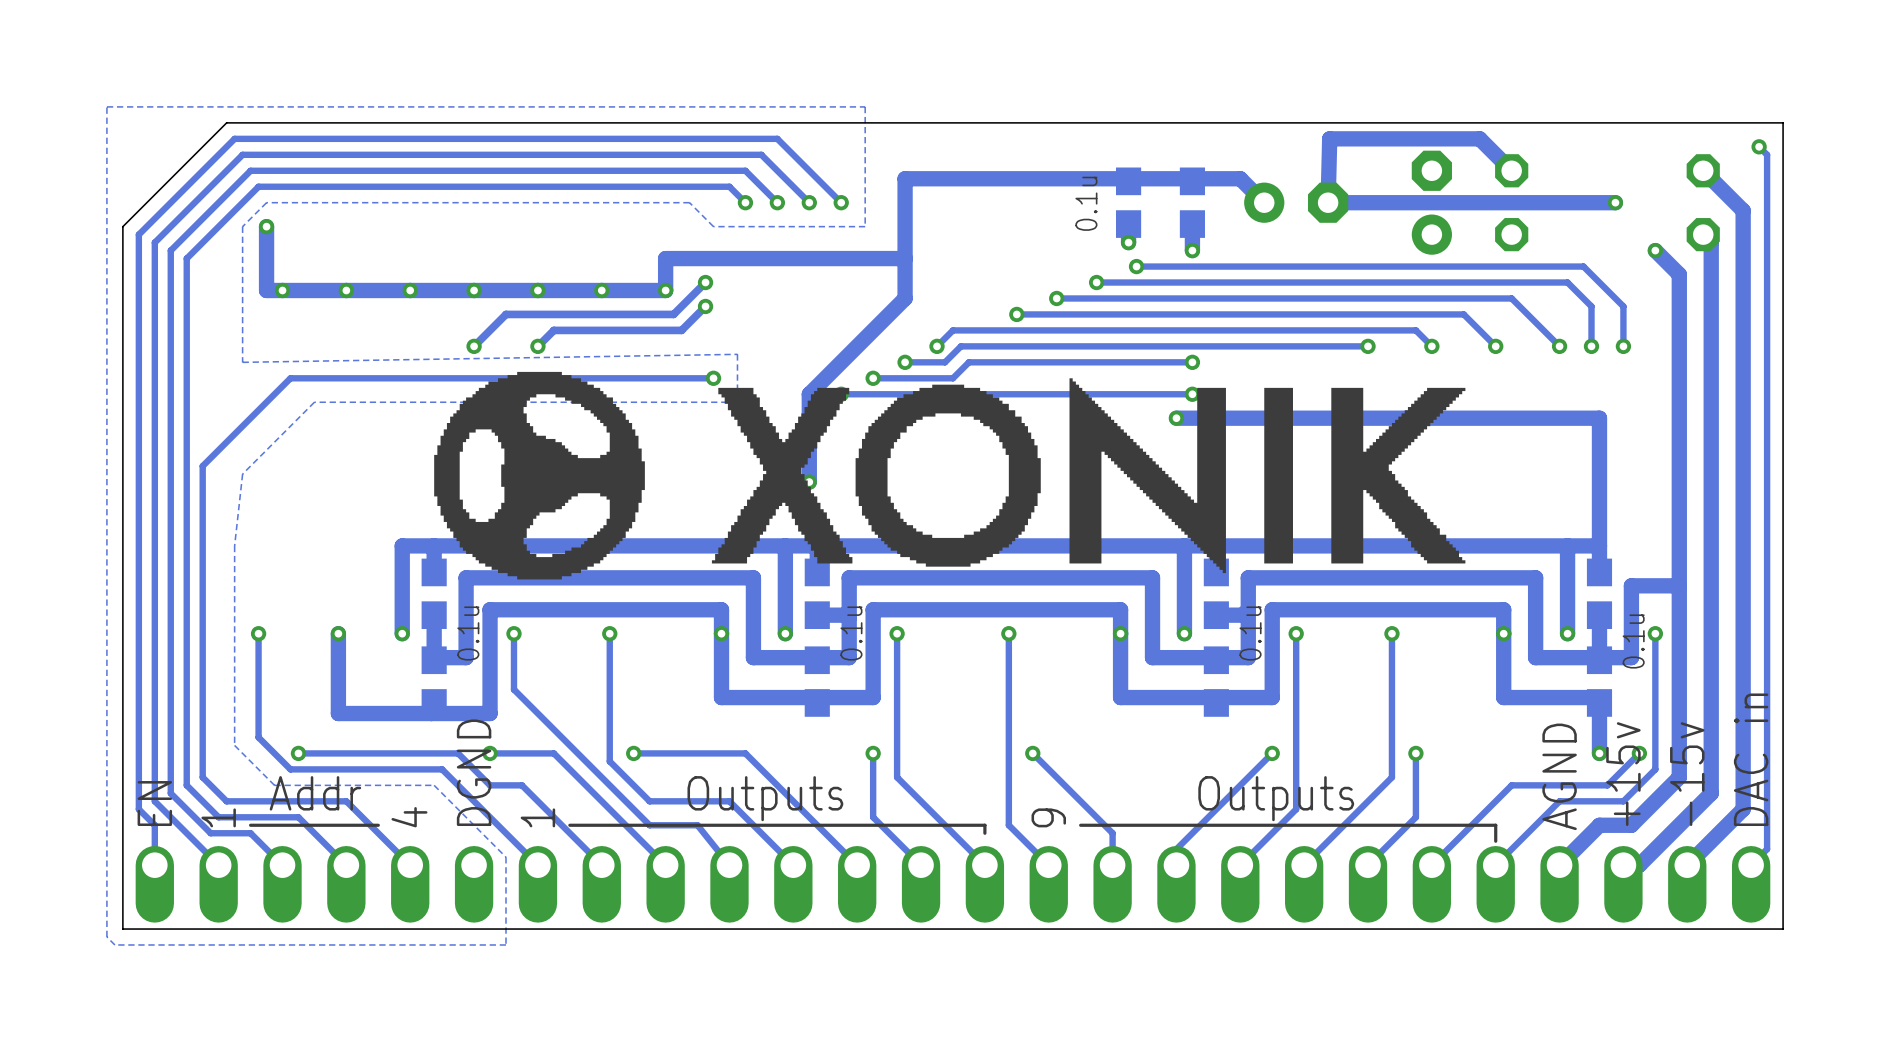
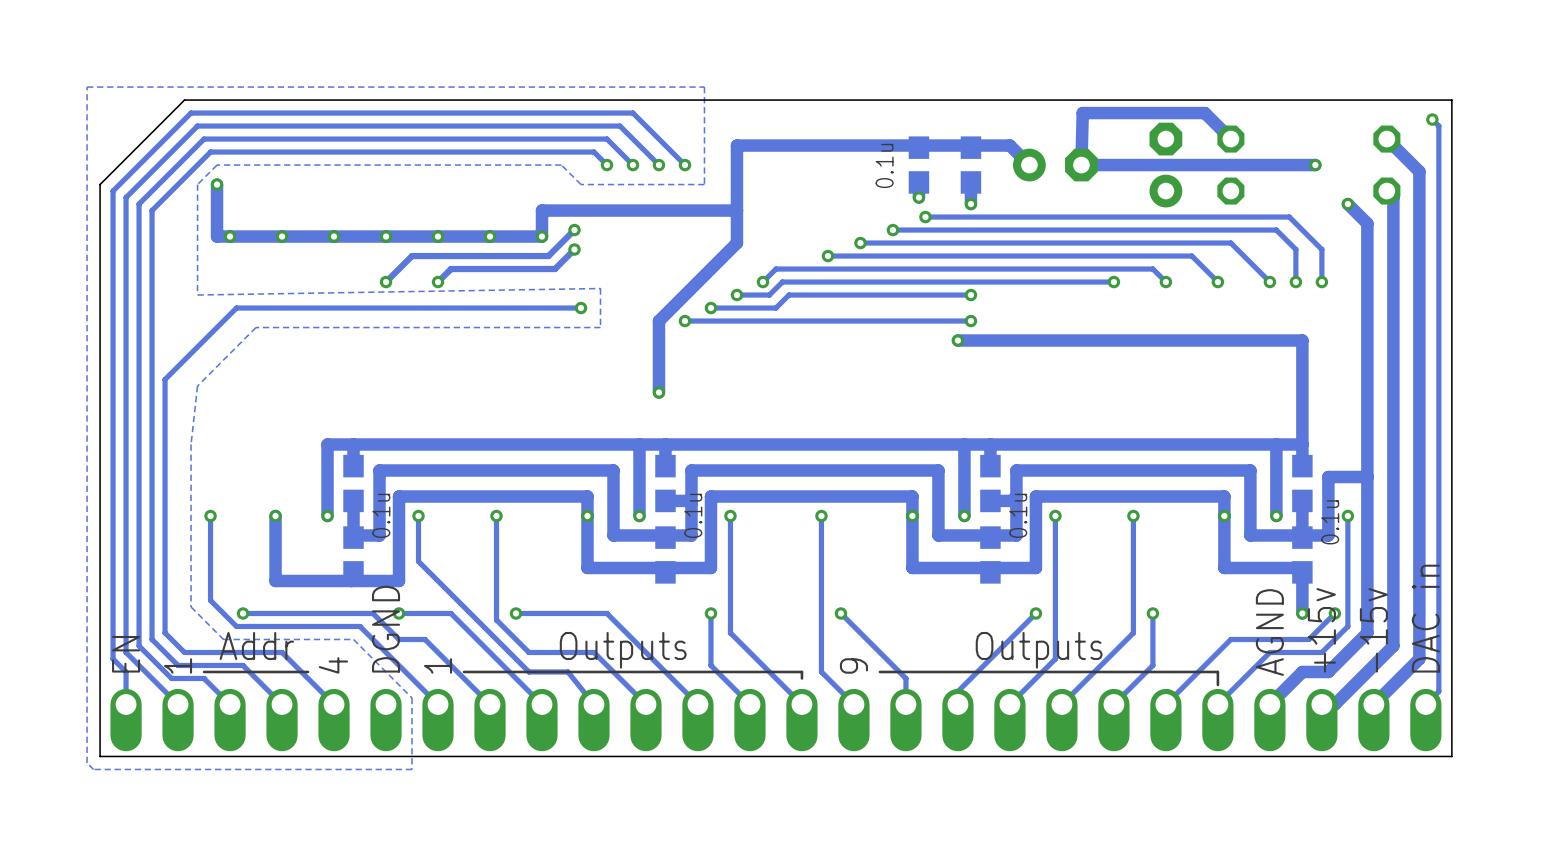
drawing: [434, 371, 645, 580] -> none
drawing: [711, 378, 1226, 574] -> none
drawing: [1264, 387, 1293, 564] -> none
drawing: [1331, 387, 1466, 564] -> none

